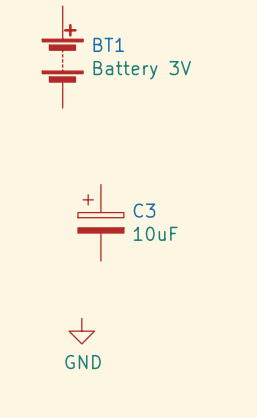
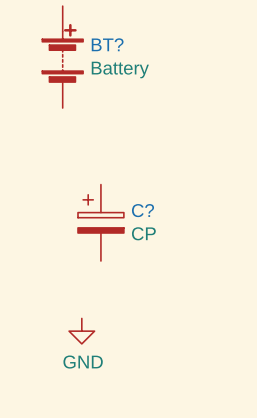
BT1 name: BT1 (108, 44) -> BT? (107, 44)
BT1 value: Battery 3V (142, 70) -> Battery (120, 70)
C3 name: C3 (144, 210) -> C? (142, 210)
C3 value: 10uF (155, 233) -> CP (143, 233)

